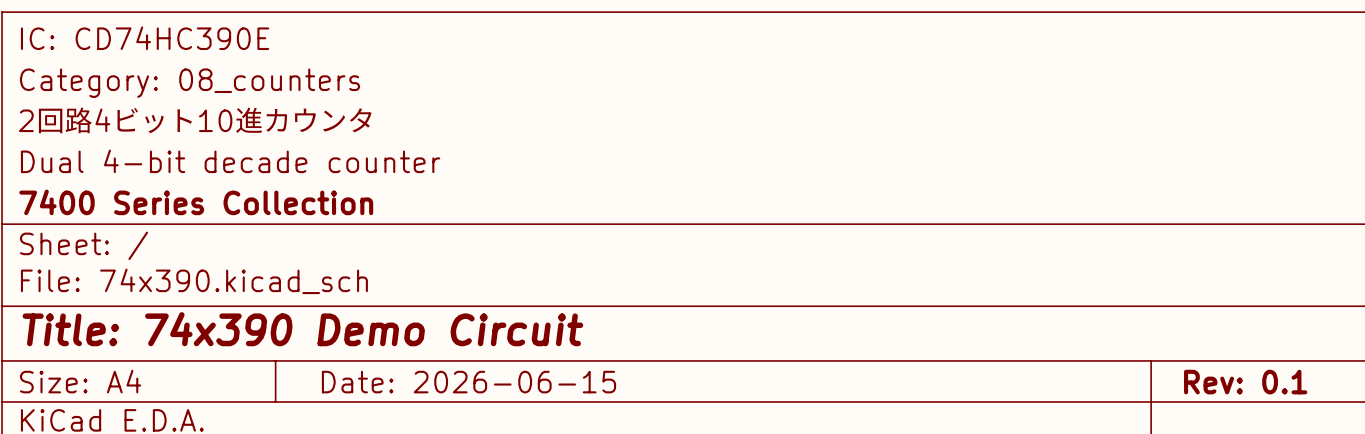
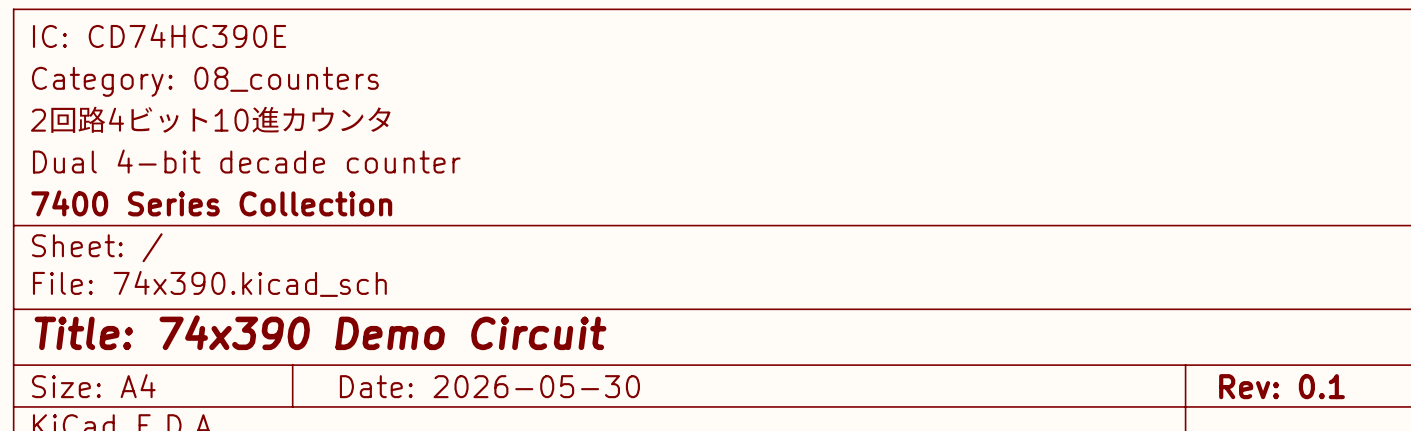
title block: Date: 2026-06-15 (468, 382) -> Date: 2026-05-30 (489, 386)

